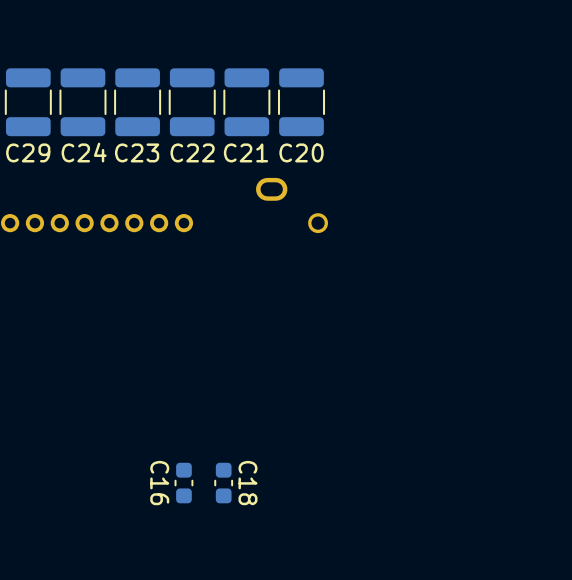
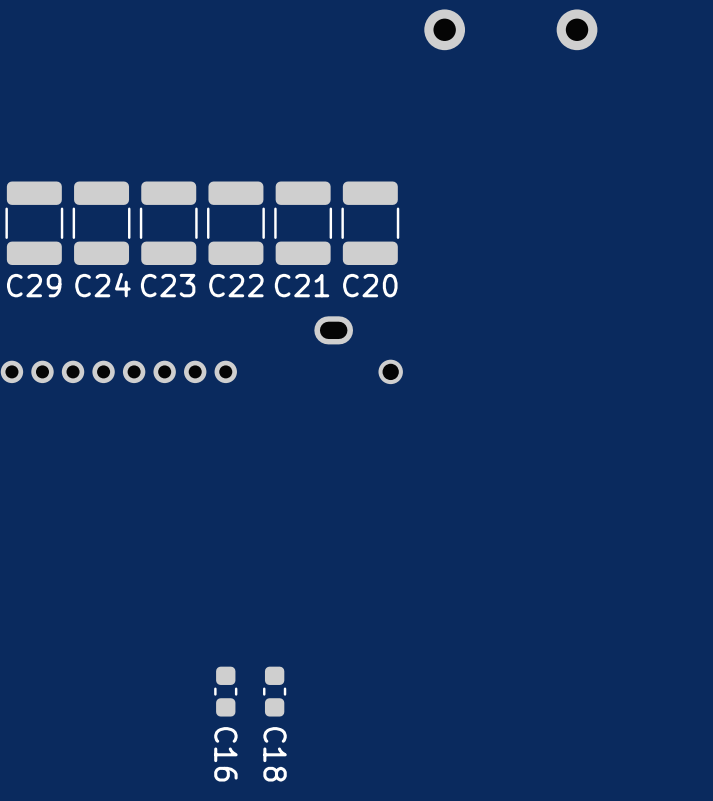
C16 name position: C16 (159, 483) -> C16 (225, 754)
C18 name position: C18 (247, 483) -> C18 (275, 754)

